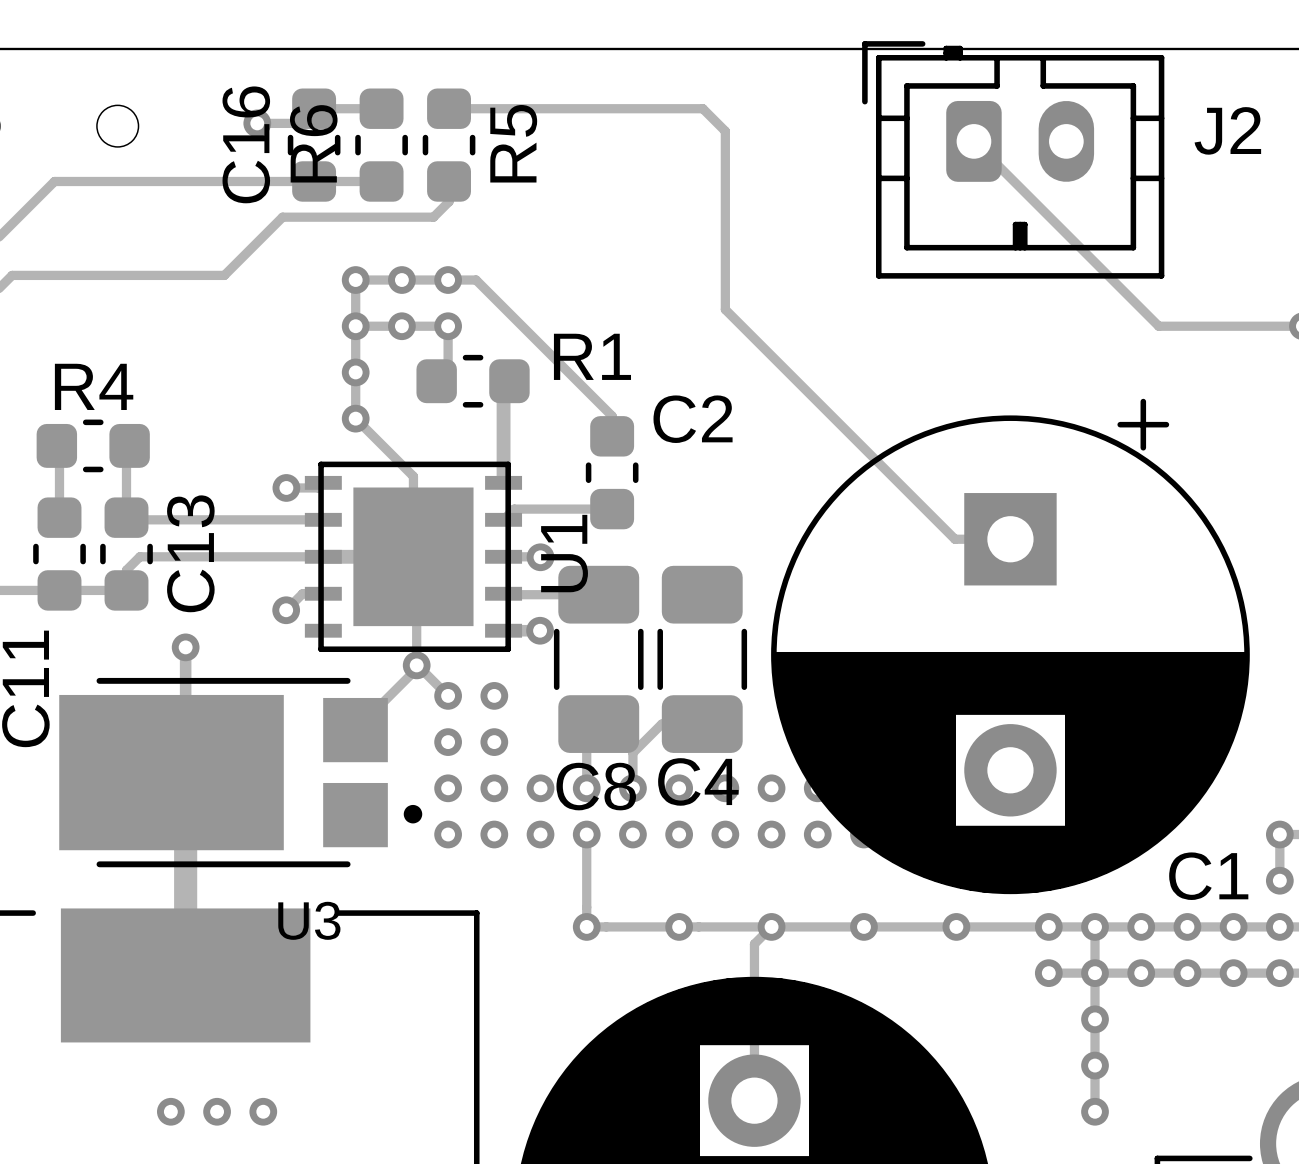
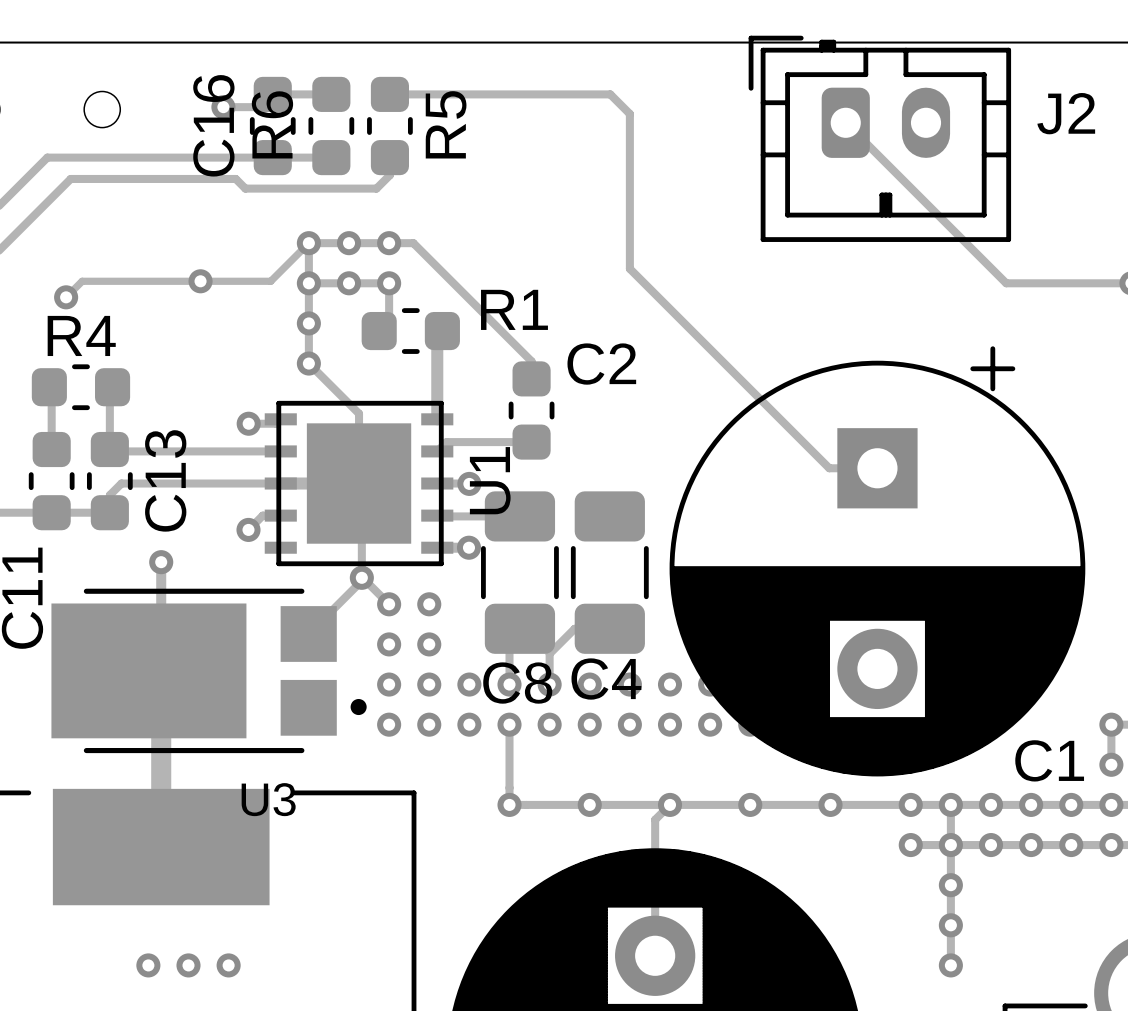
track: (282, 217) (224, 275) (12, 275) -> (245, 188) (235, 178) (70, 178) (10, 239)
track: none -> (308, 243) (270, 281) (82, 281) (66, 297)
via: none -> (200, 281)
via: none -> (66, 297)

